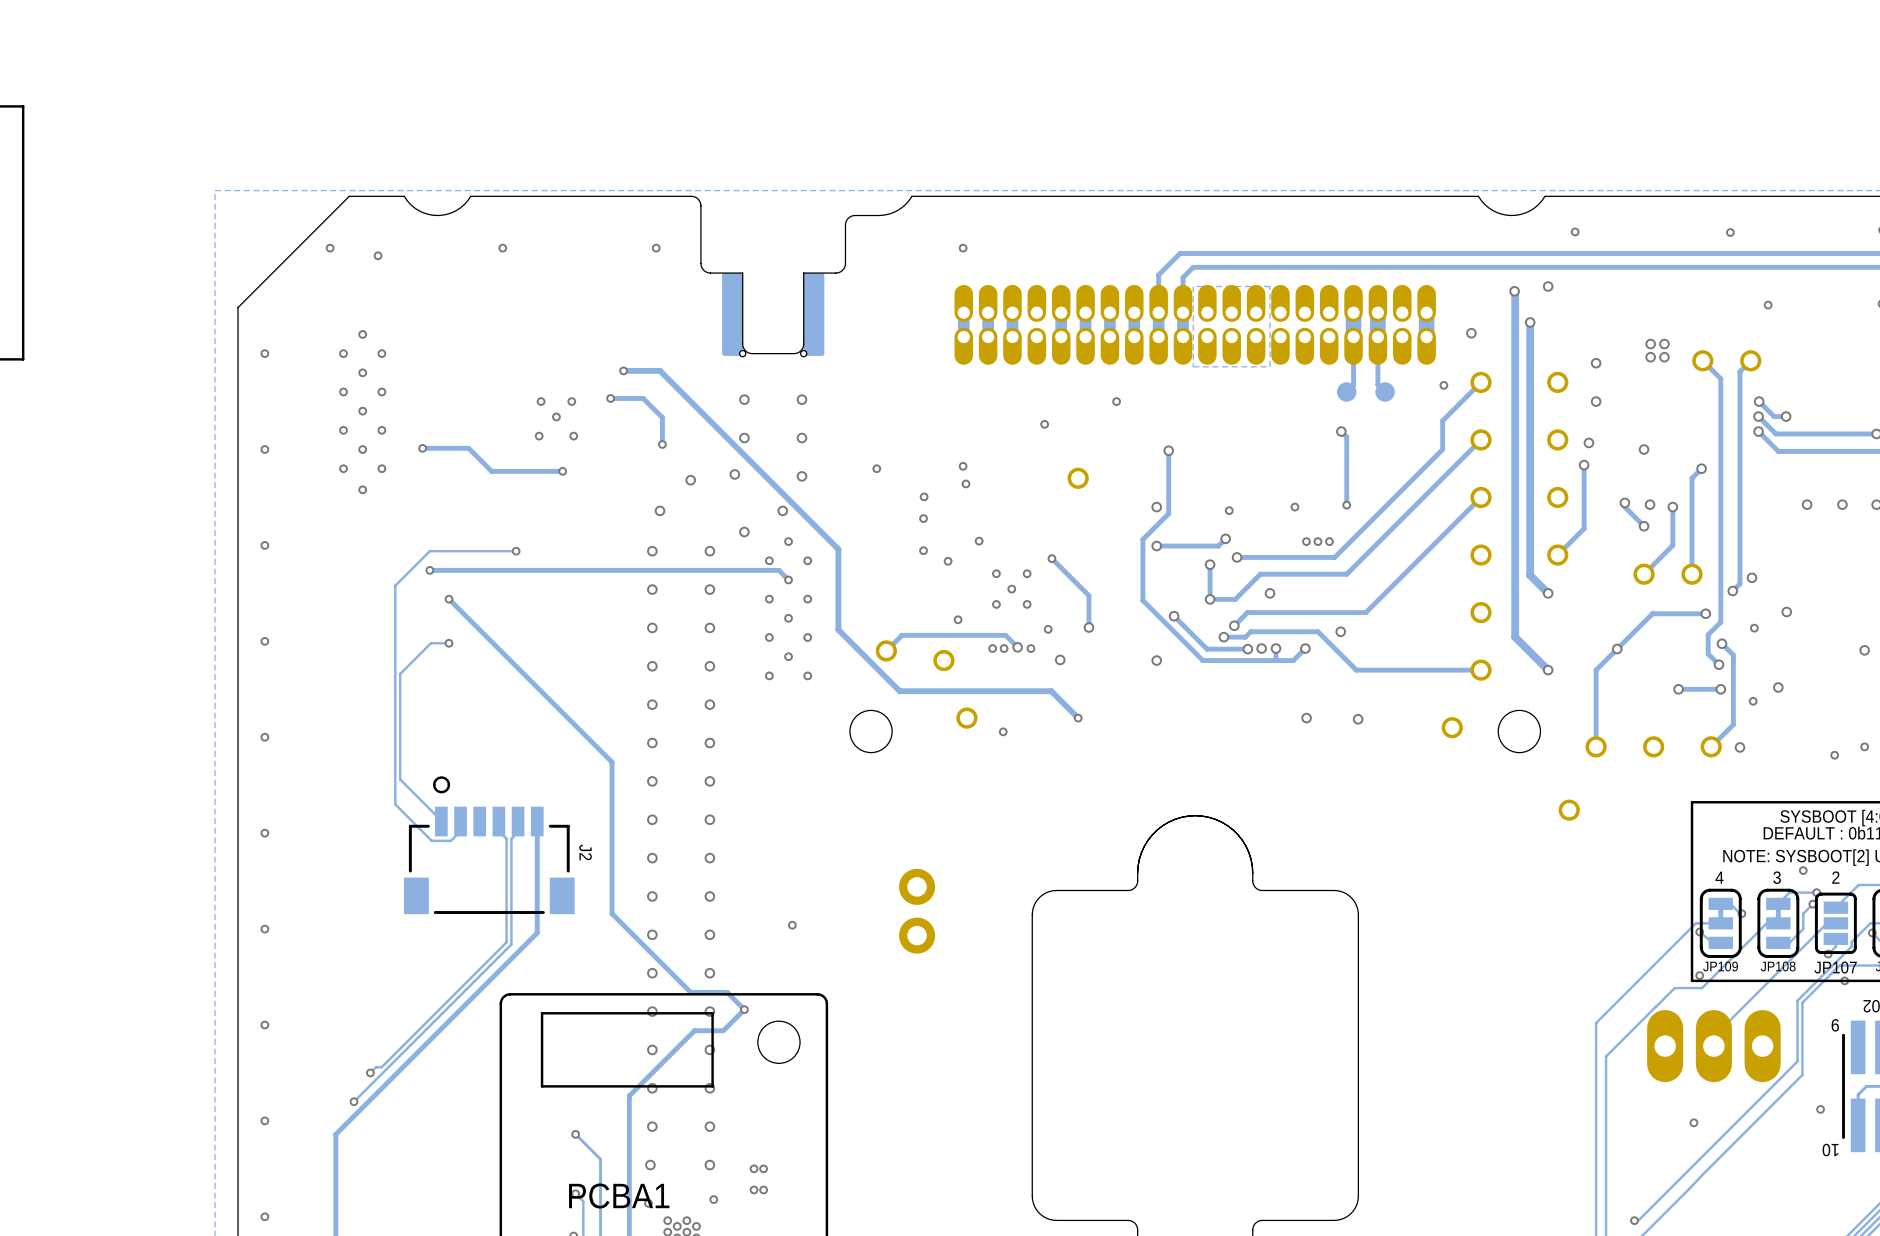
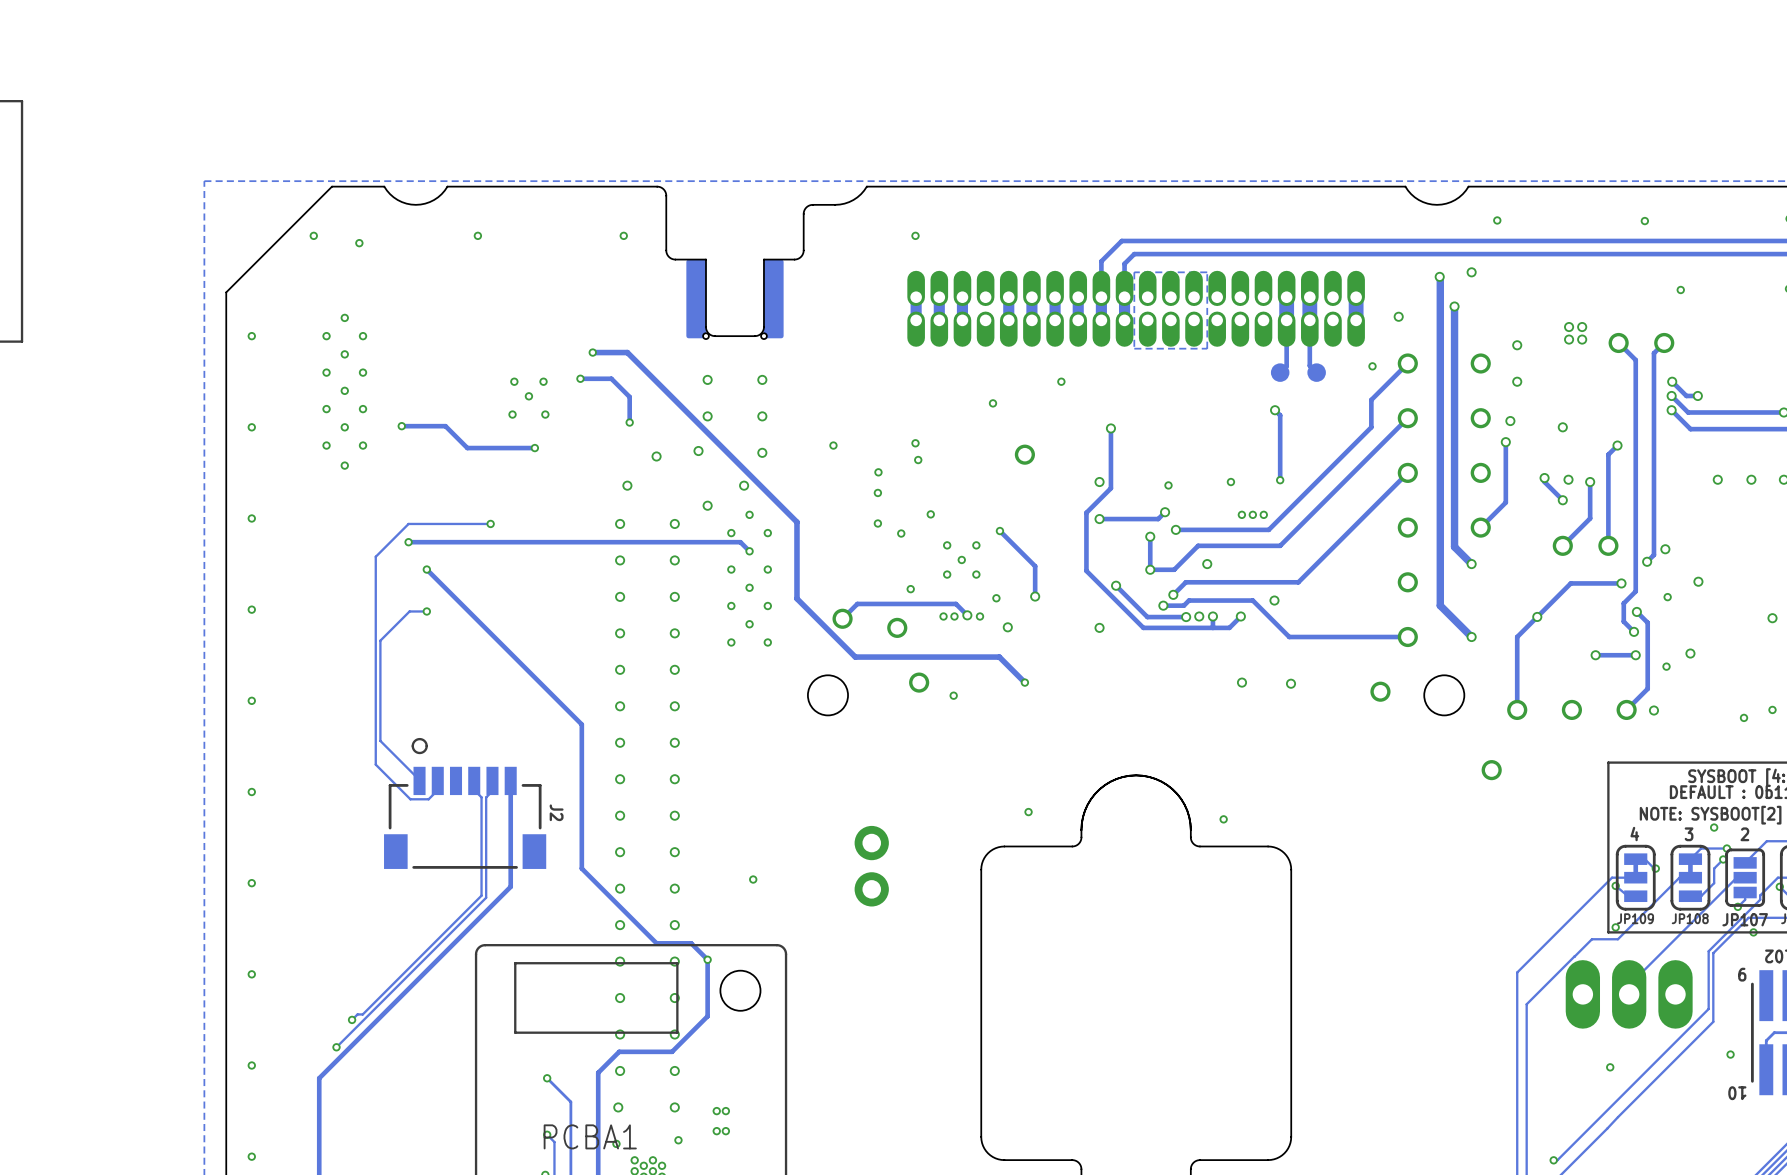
via: none -> (1028, 812)
via: none -> (1223, 819)
track: (744, 1009) (723, 1030) (694, 1030) (629, 1095) (629, 1128) -> (707, 959) (707, 1016) (672, 1051) (619, 1051) (598, 1072)

